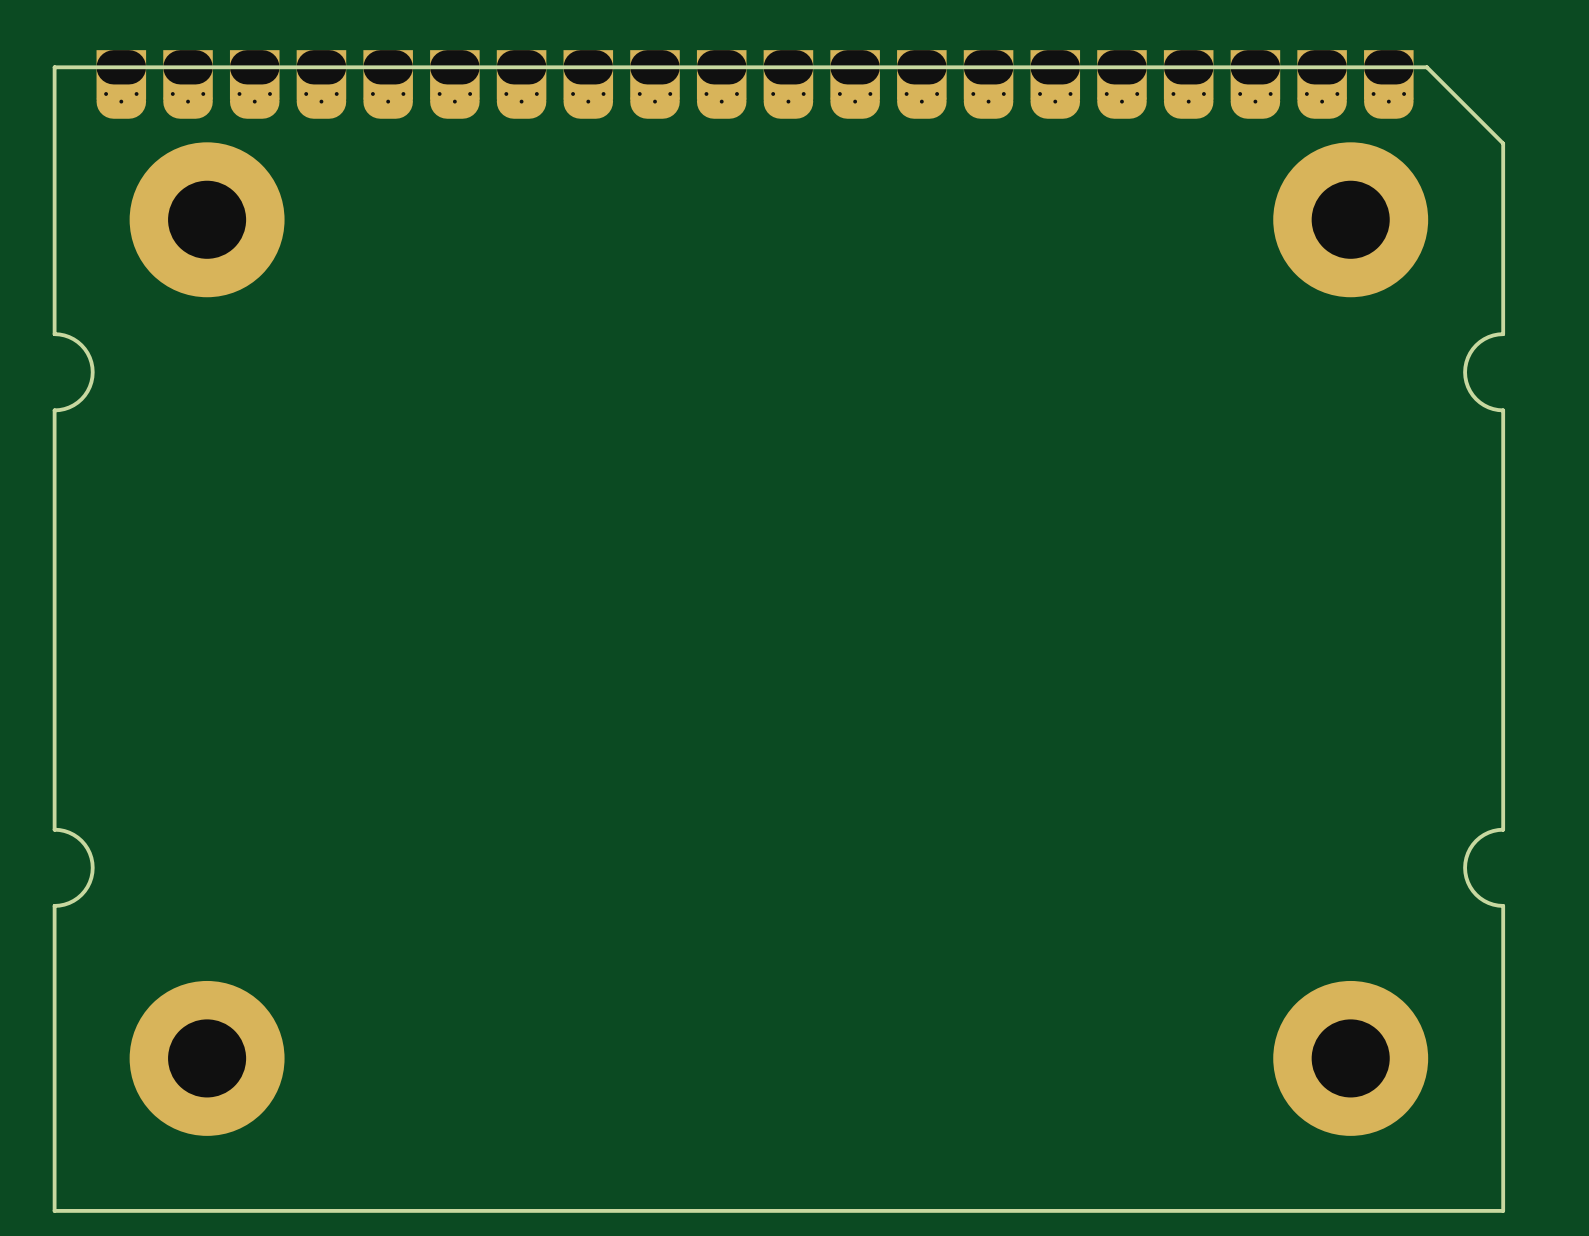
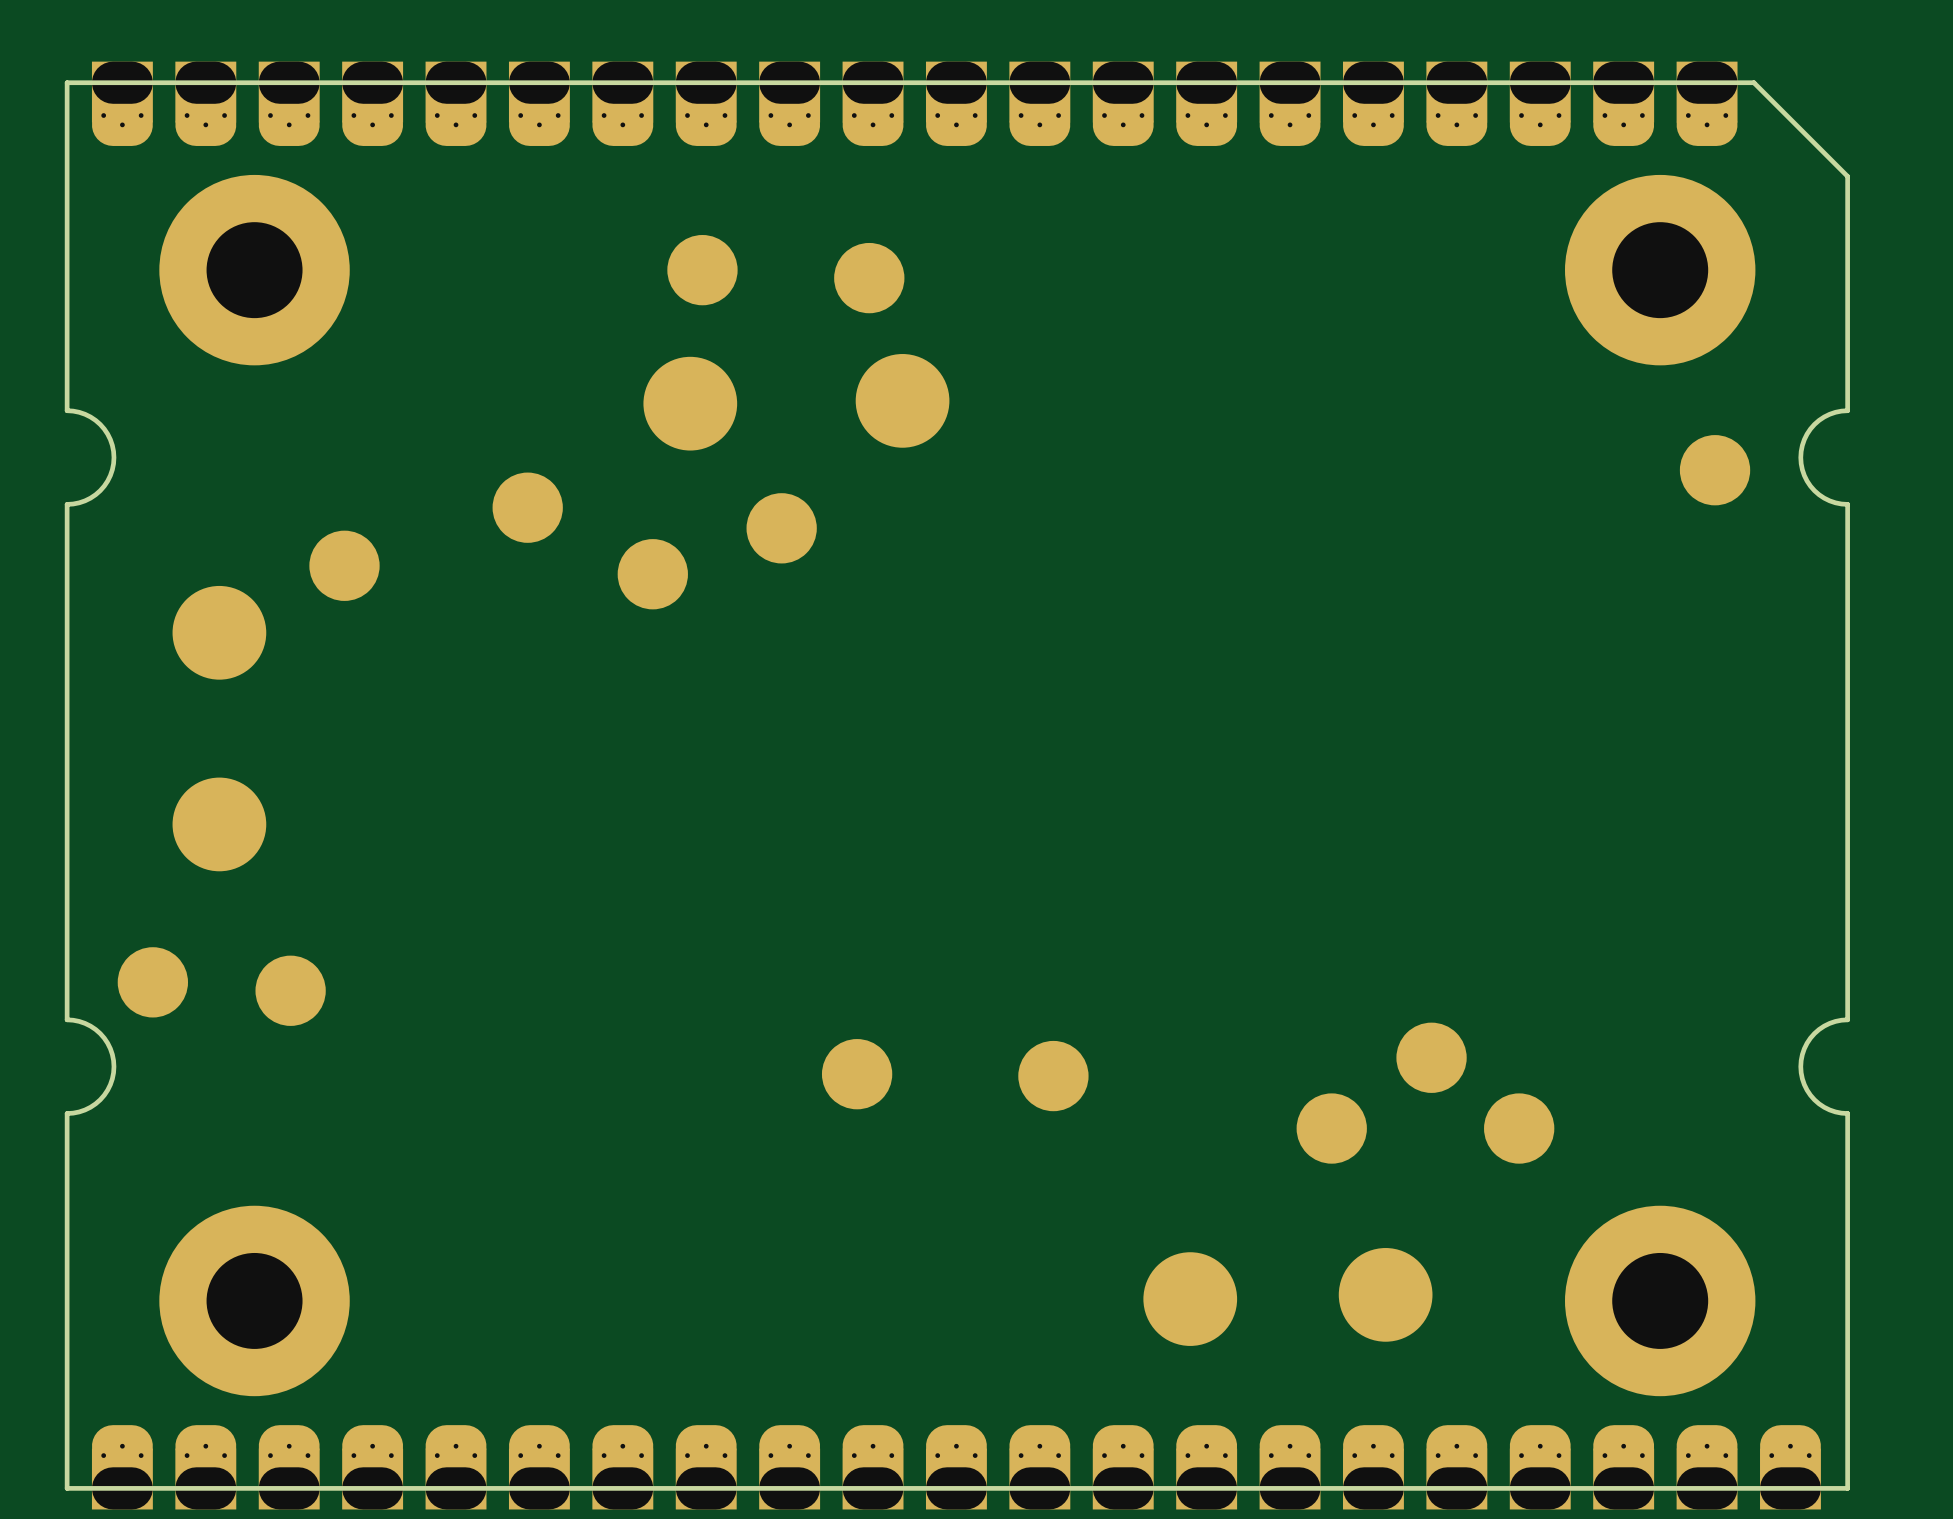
part footprint: [96, 50, 1414, 119] -> [91, 61, 1738, 146]
part: none -> (702, 270)
part: none -> (869, 278)
part: none -> (902, 400)
part: none -> (690, 403)
part: none -> (1715, 470)
part: none -> (527, 507)
part: none -> (781, 528)
part: none -> (344, 565)
part: none -> (652, 574)
part: none -> (219, 632)
part: none -> (219, 824)
part: none -> (152, 982)
part: none -> (290, 990)
part: none -> (1431, 1057)
part: none -> (857, 1074)
part: none -> (1053, 1076)
part: none -> (1331, 1128)
part: none -> (1519, 1128)
part: none -> (1385, 1294)
part: none -> (1190, 1299)
part: none -> (956, 1467)

